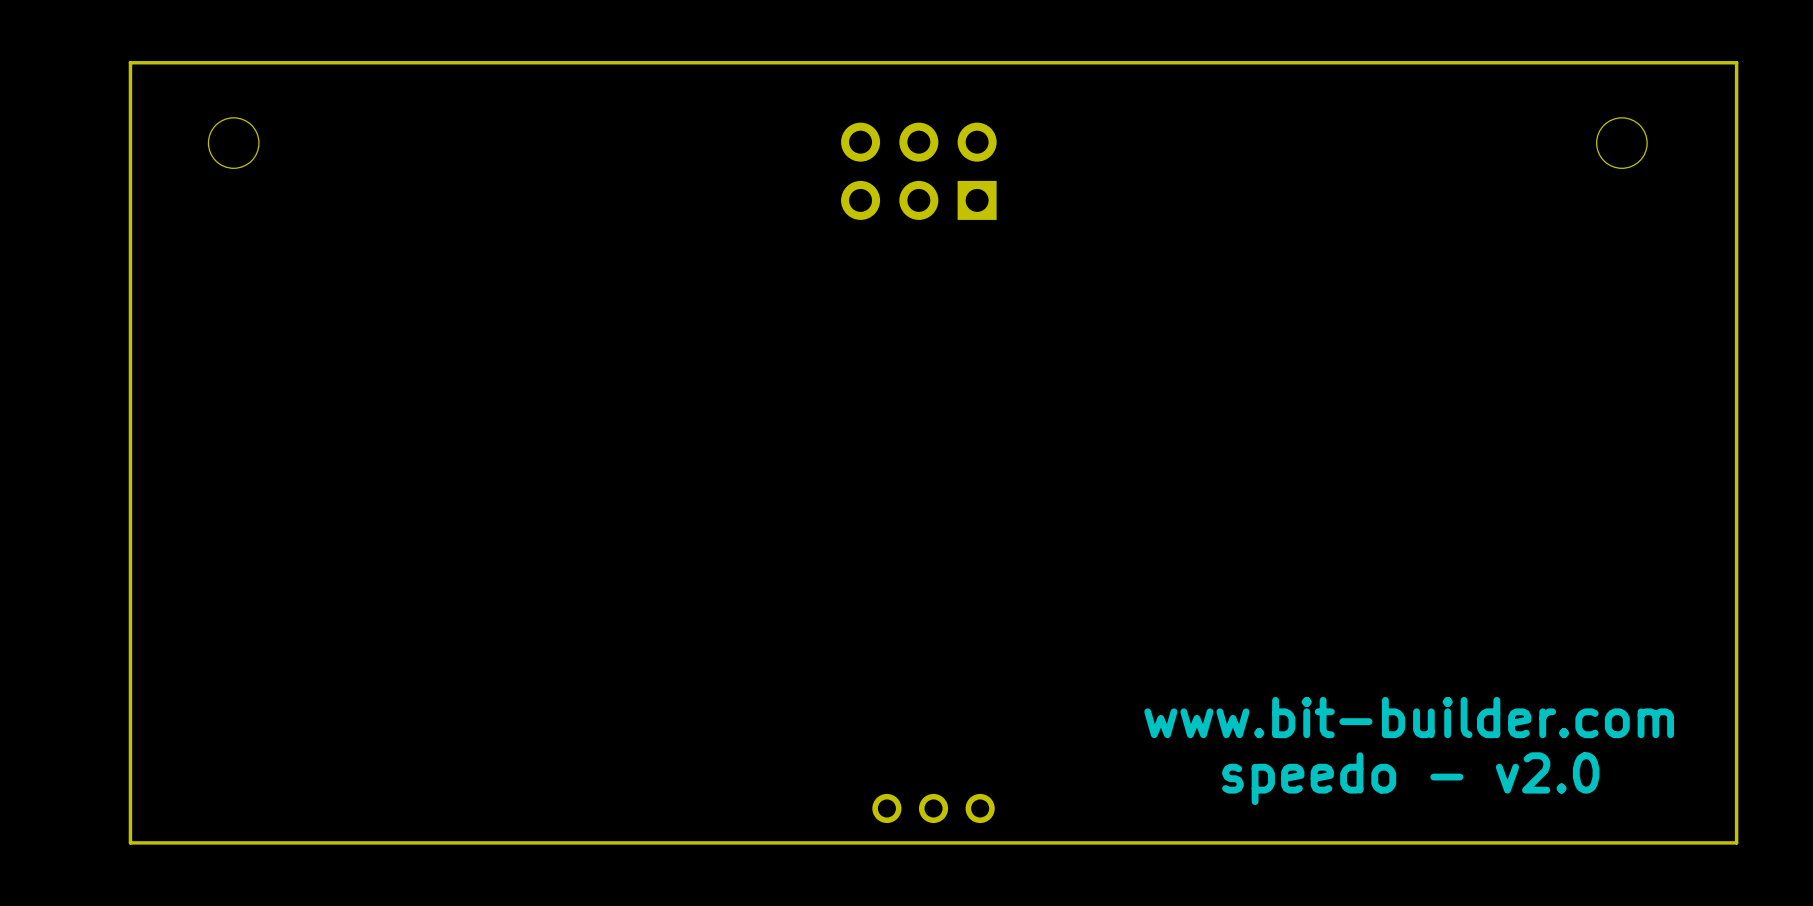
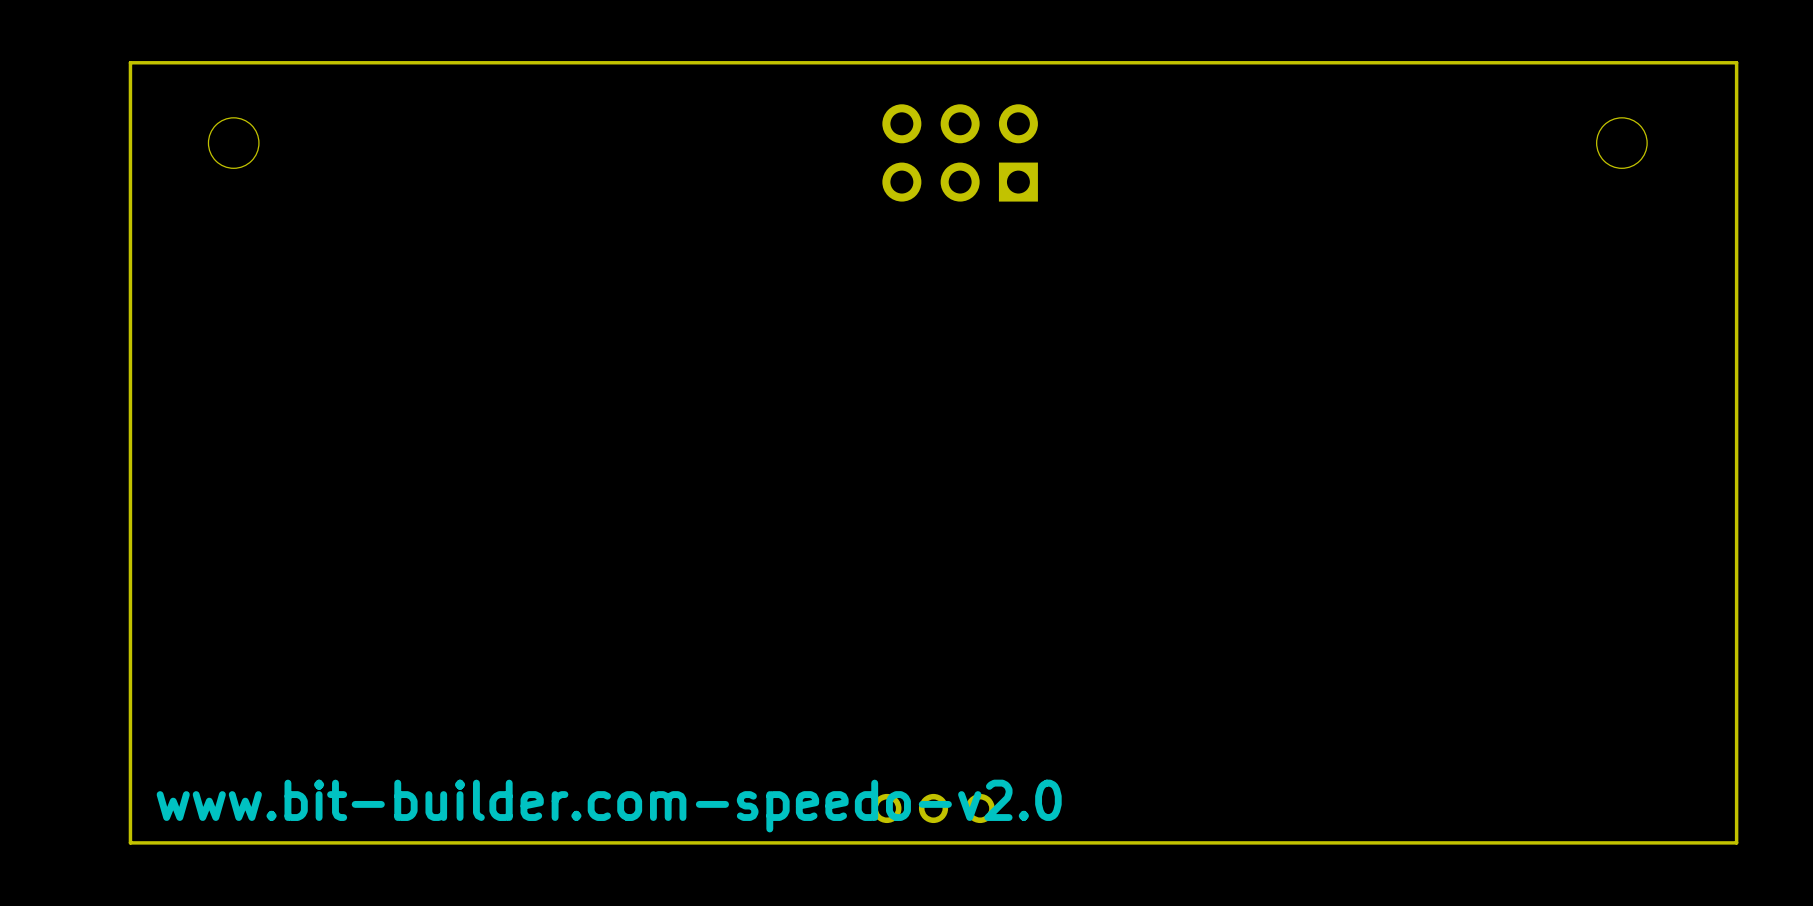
part position: (918, 171) -> (960, 152)
text: www.bit-builder.com (1409, 717) -> none
text: speedo - v2.0 (1410, 778) -> none
text: none -> www.bit-builder.com-speedo-v2.0 (609, 806)

